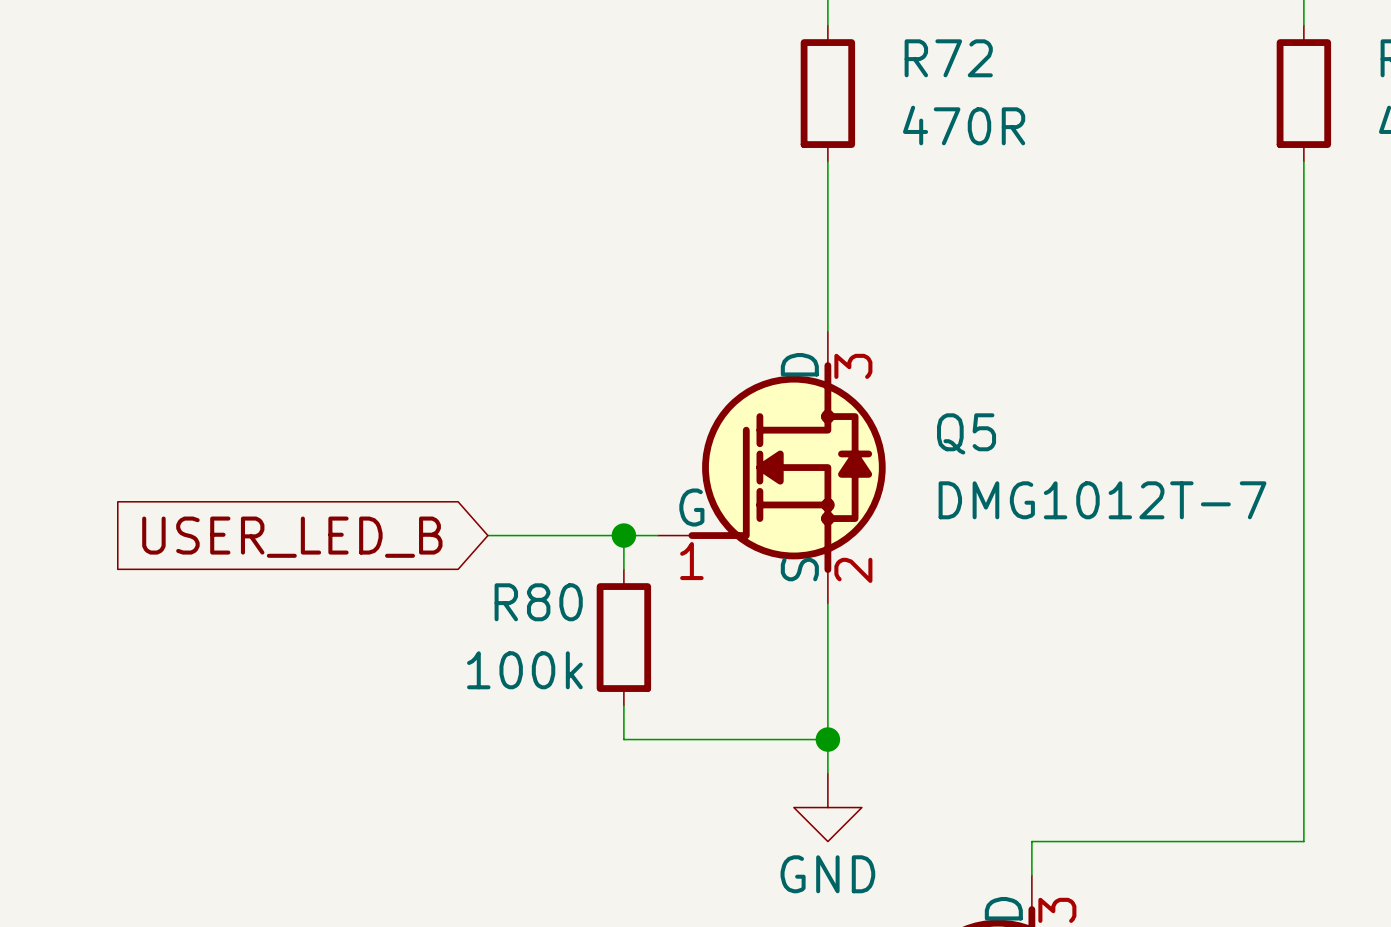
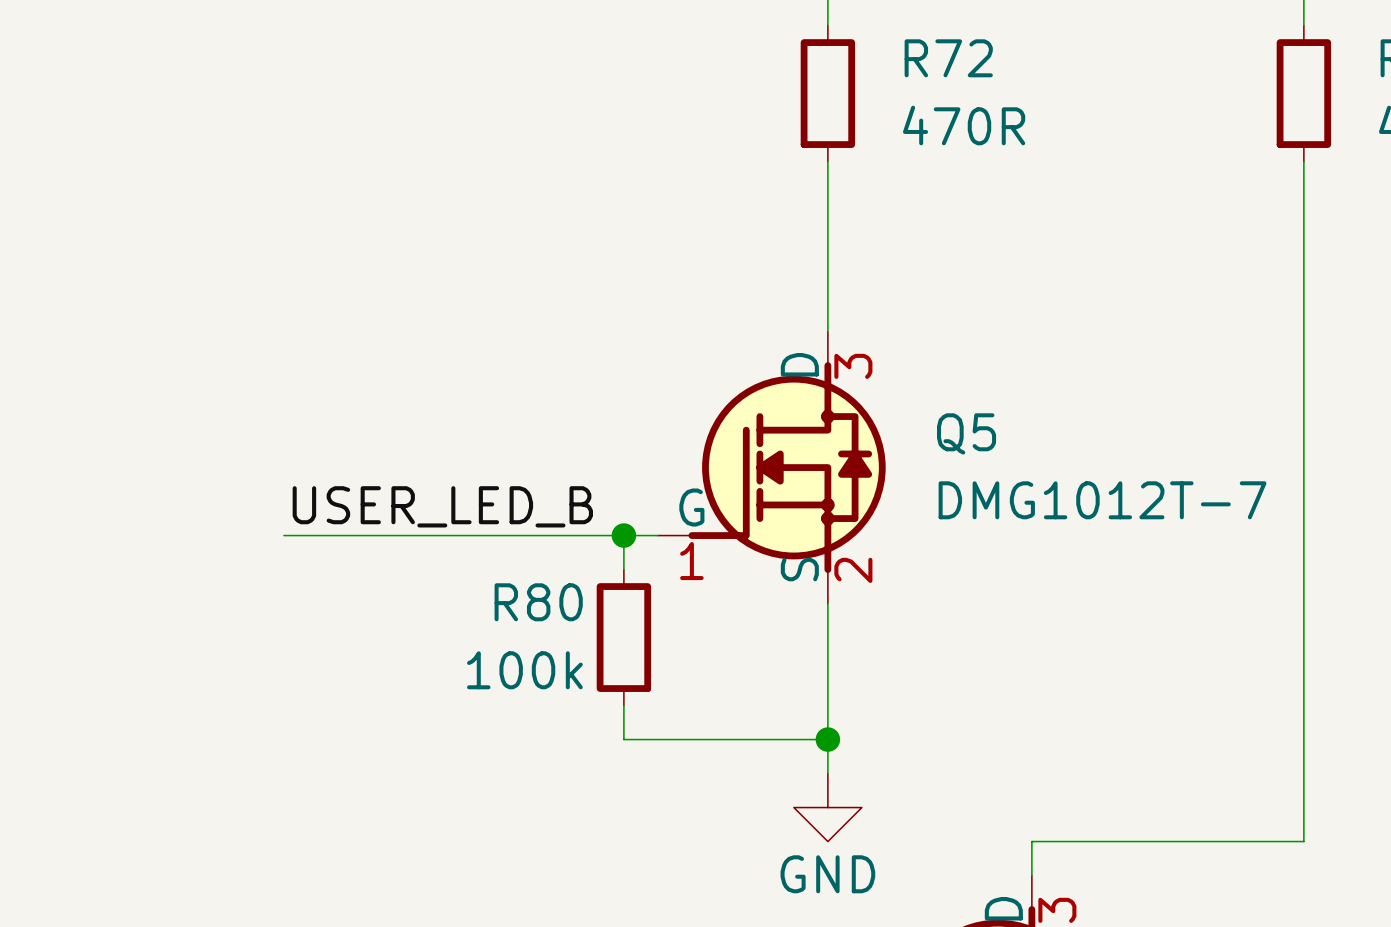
label: none -> USER_LED_B (442, 506)
wire: none -> (283, 535) (487, 535)
global label: USER_LED_B (292, 537) -> none

